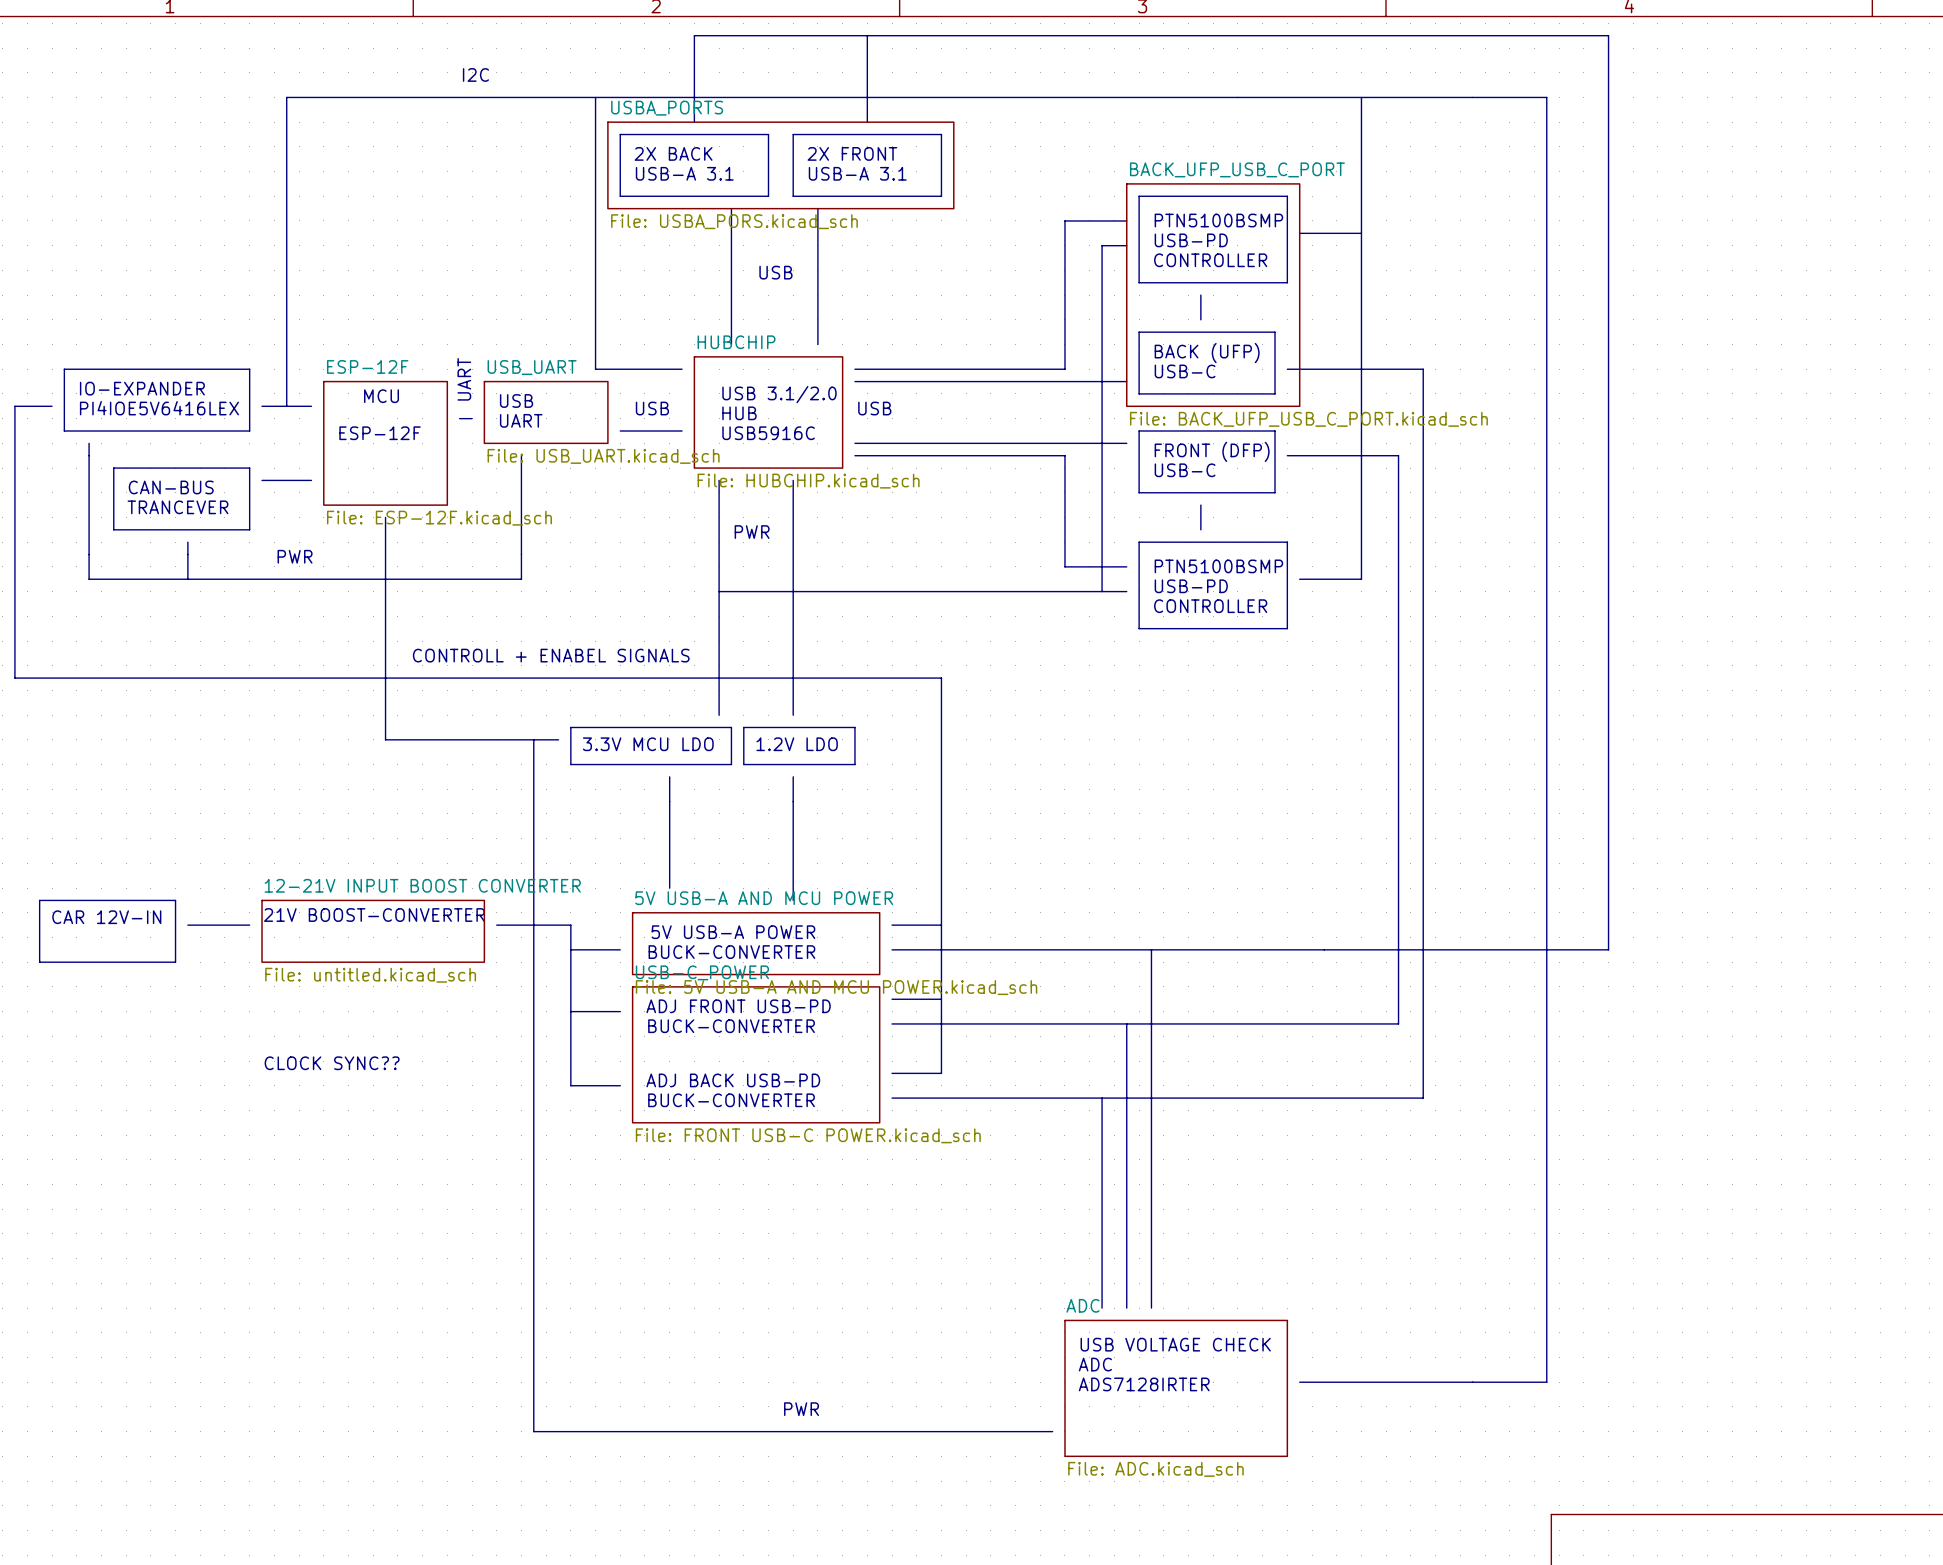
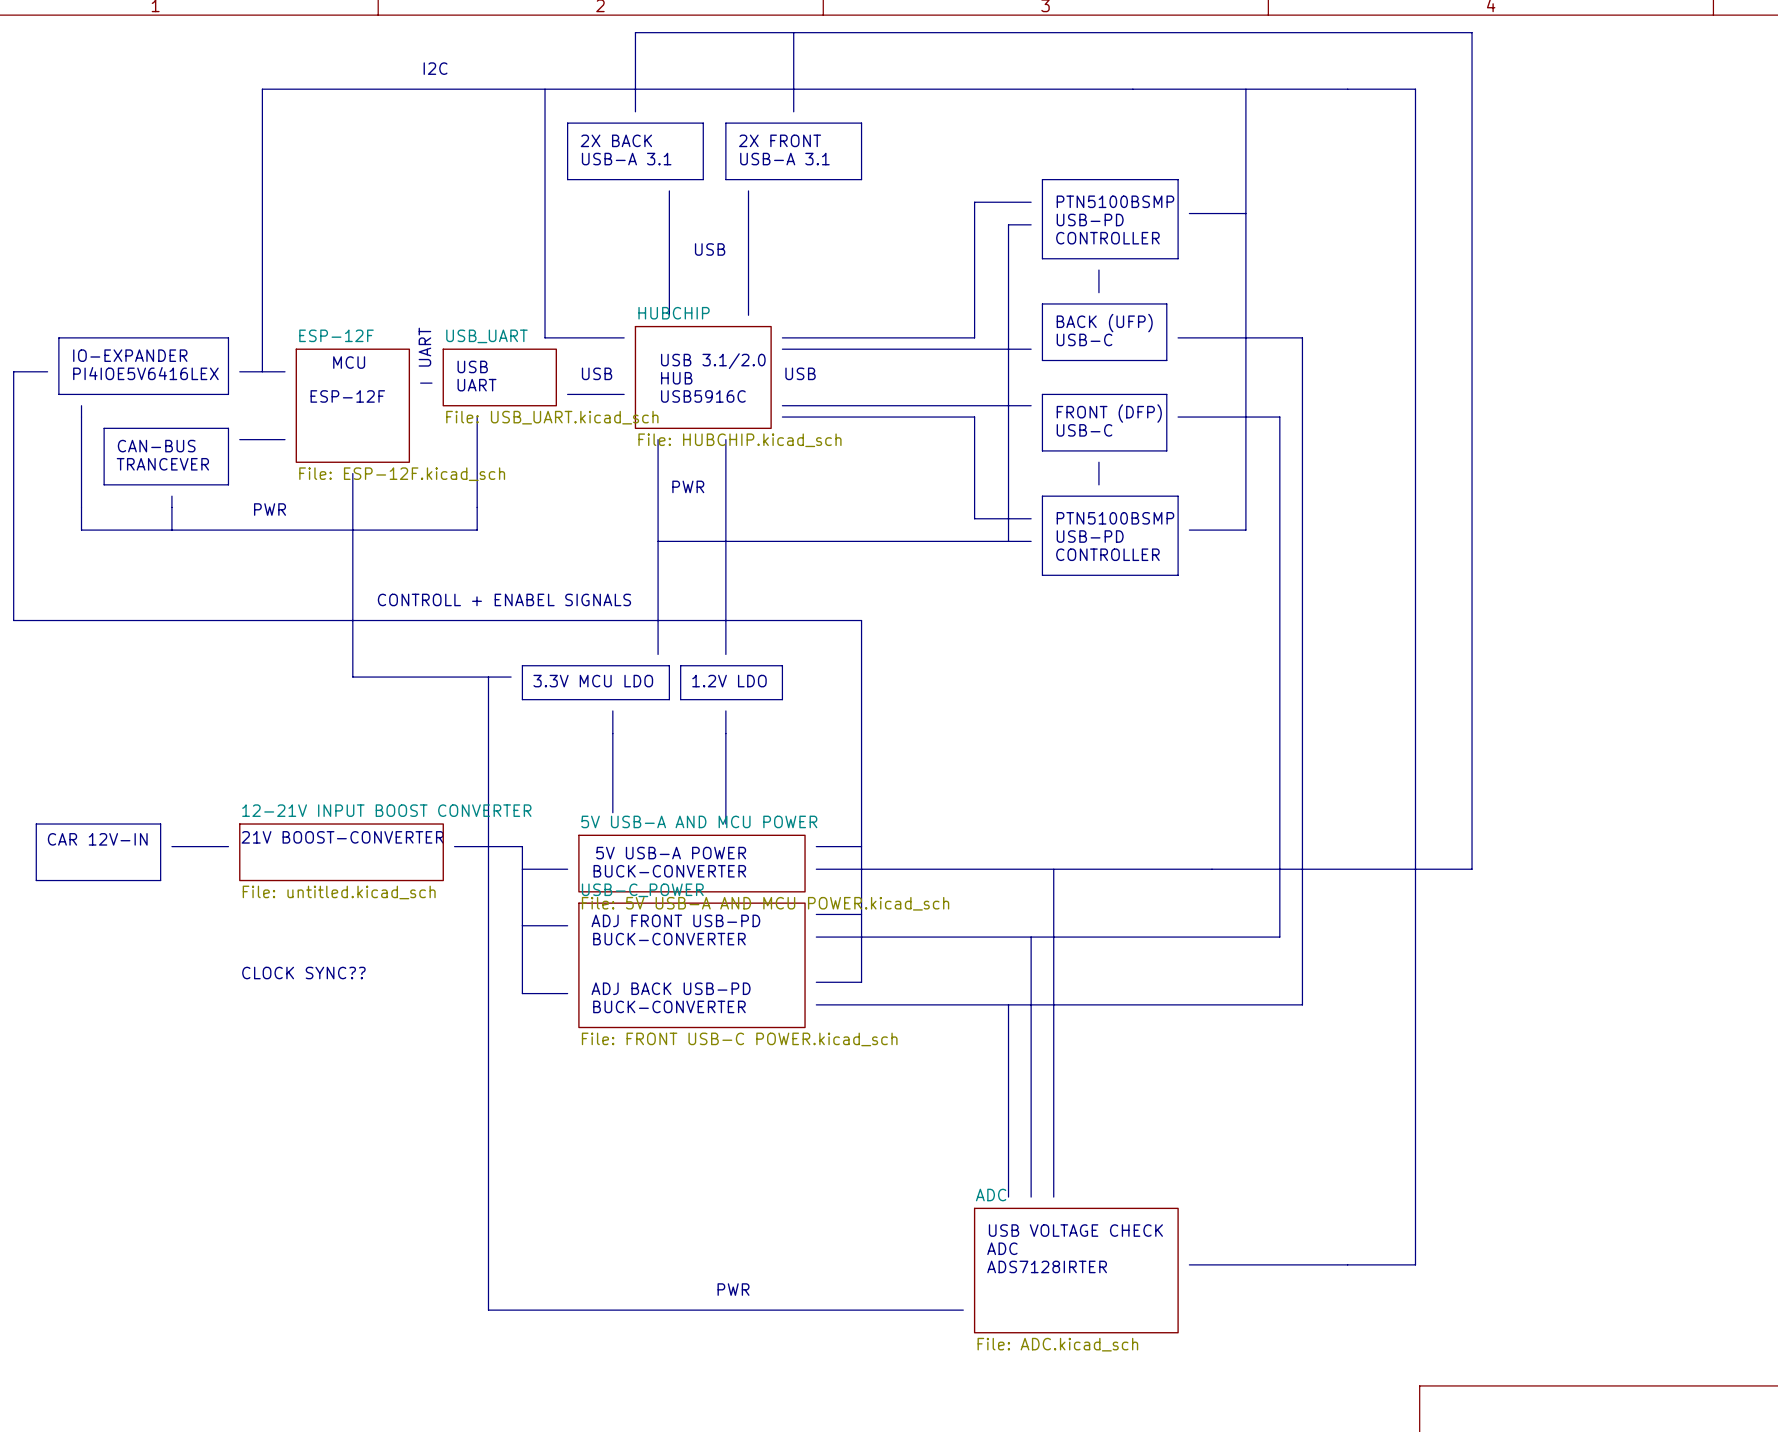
sheet USBA_PORTS: File: USBA_PORS.kicad_sch (780, 165) -> none
sheet BACK_UFP_USB_C_PORT: File: BACK_UFP_USB_C_PORT.kicad_sch (1213, 295) -> none

